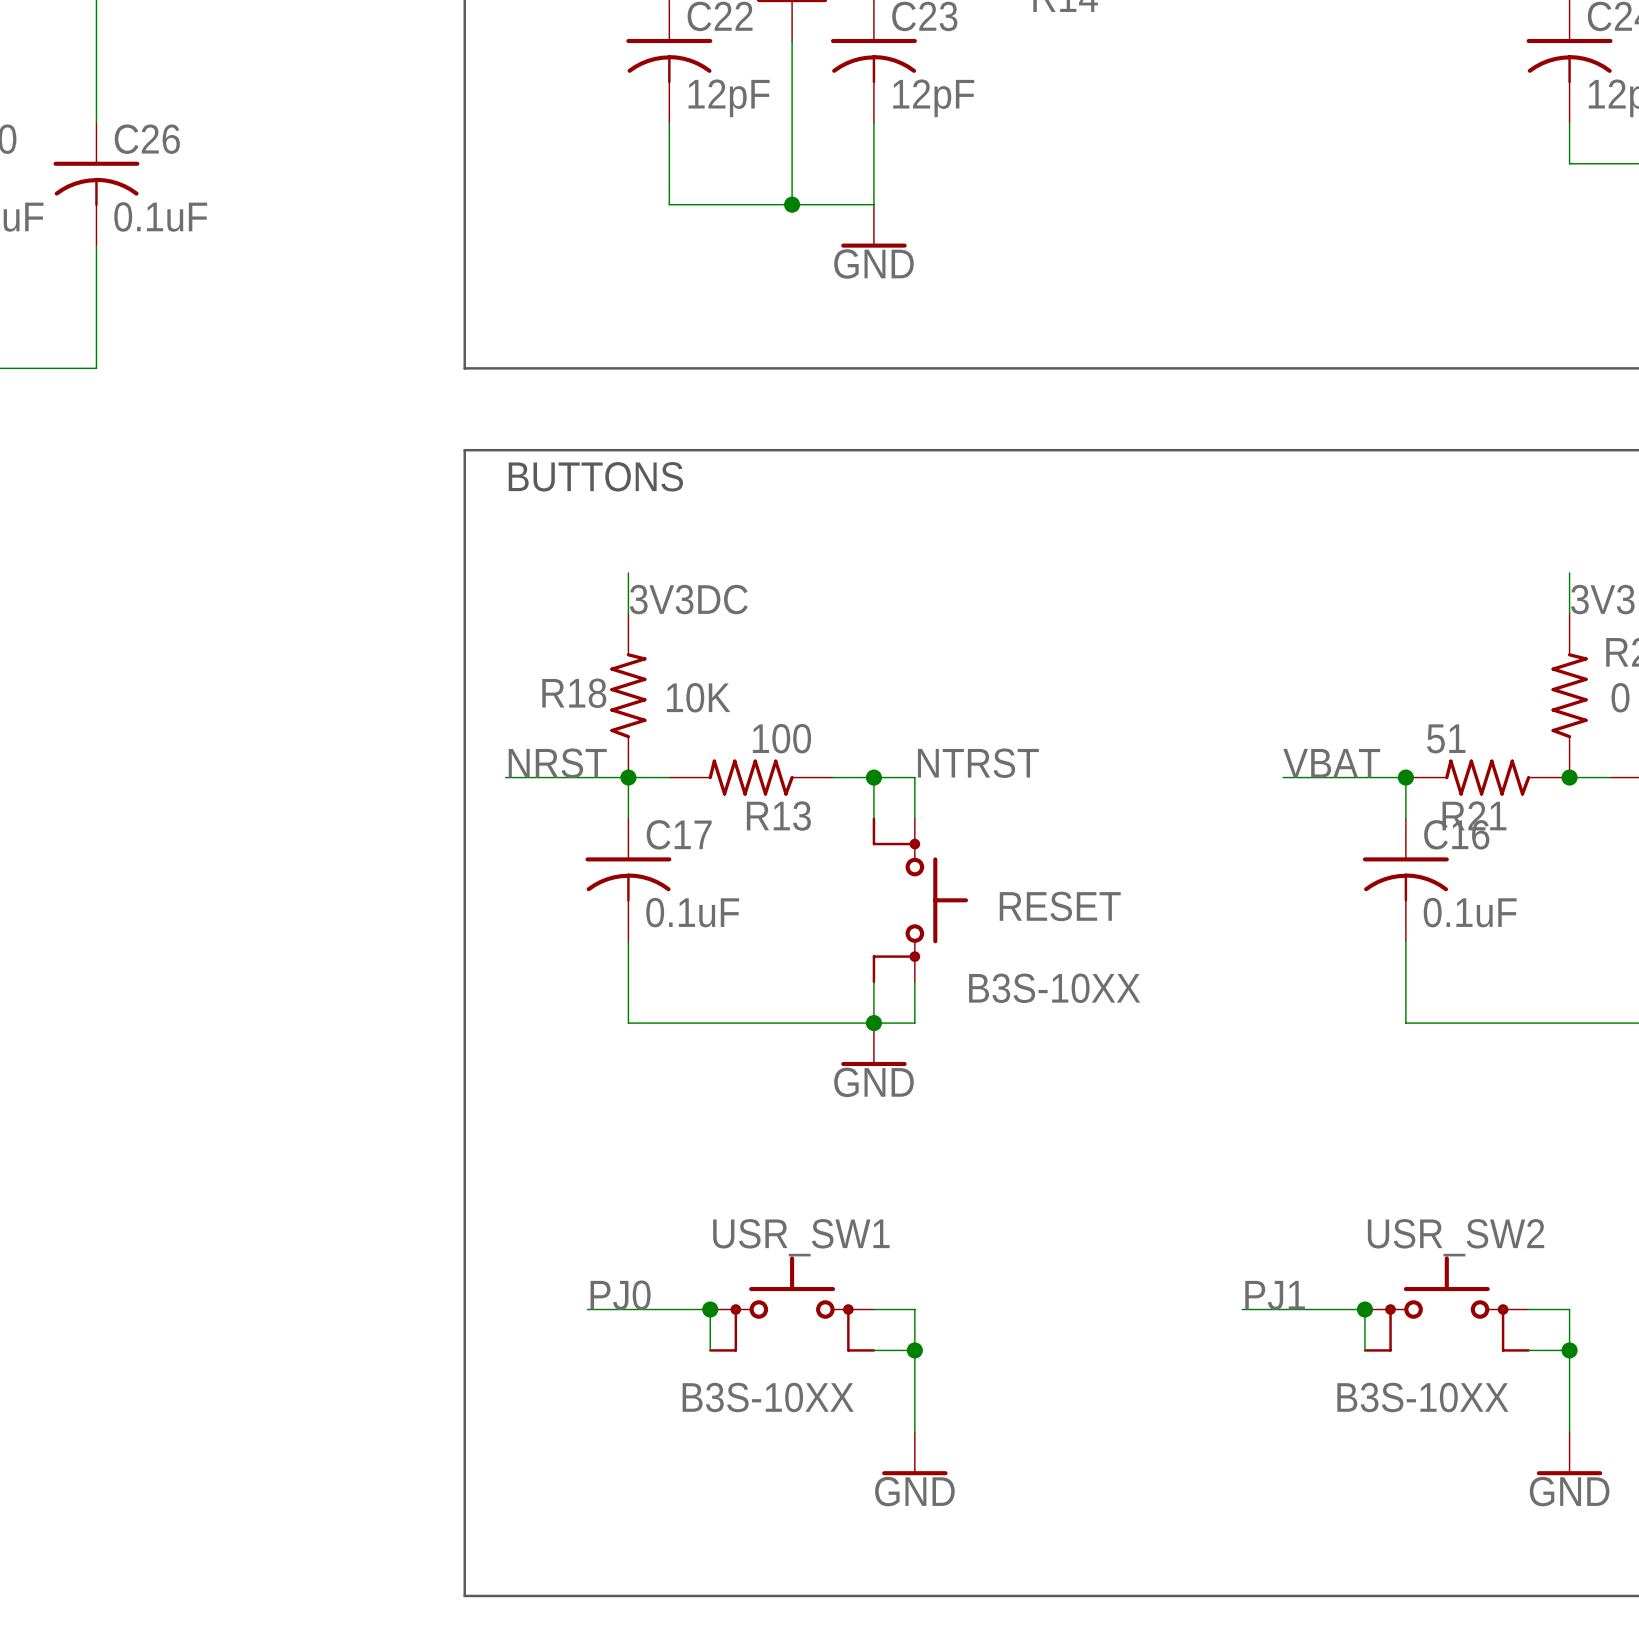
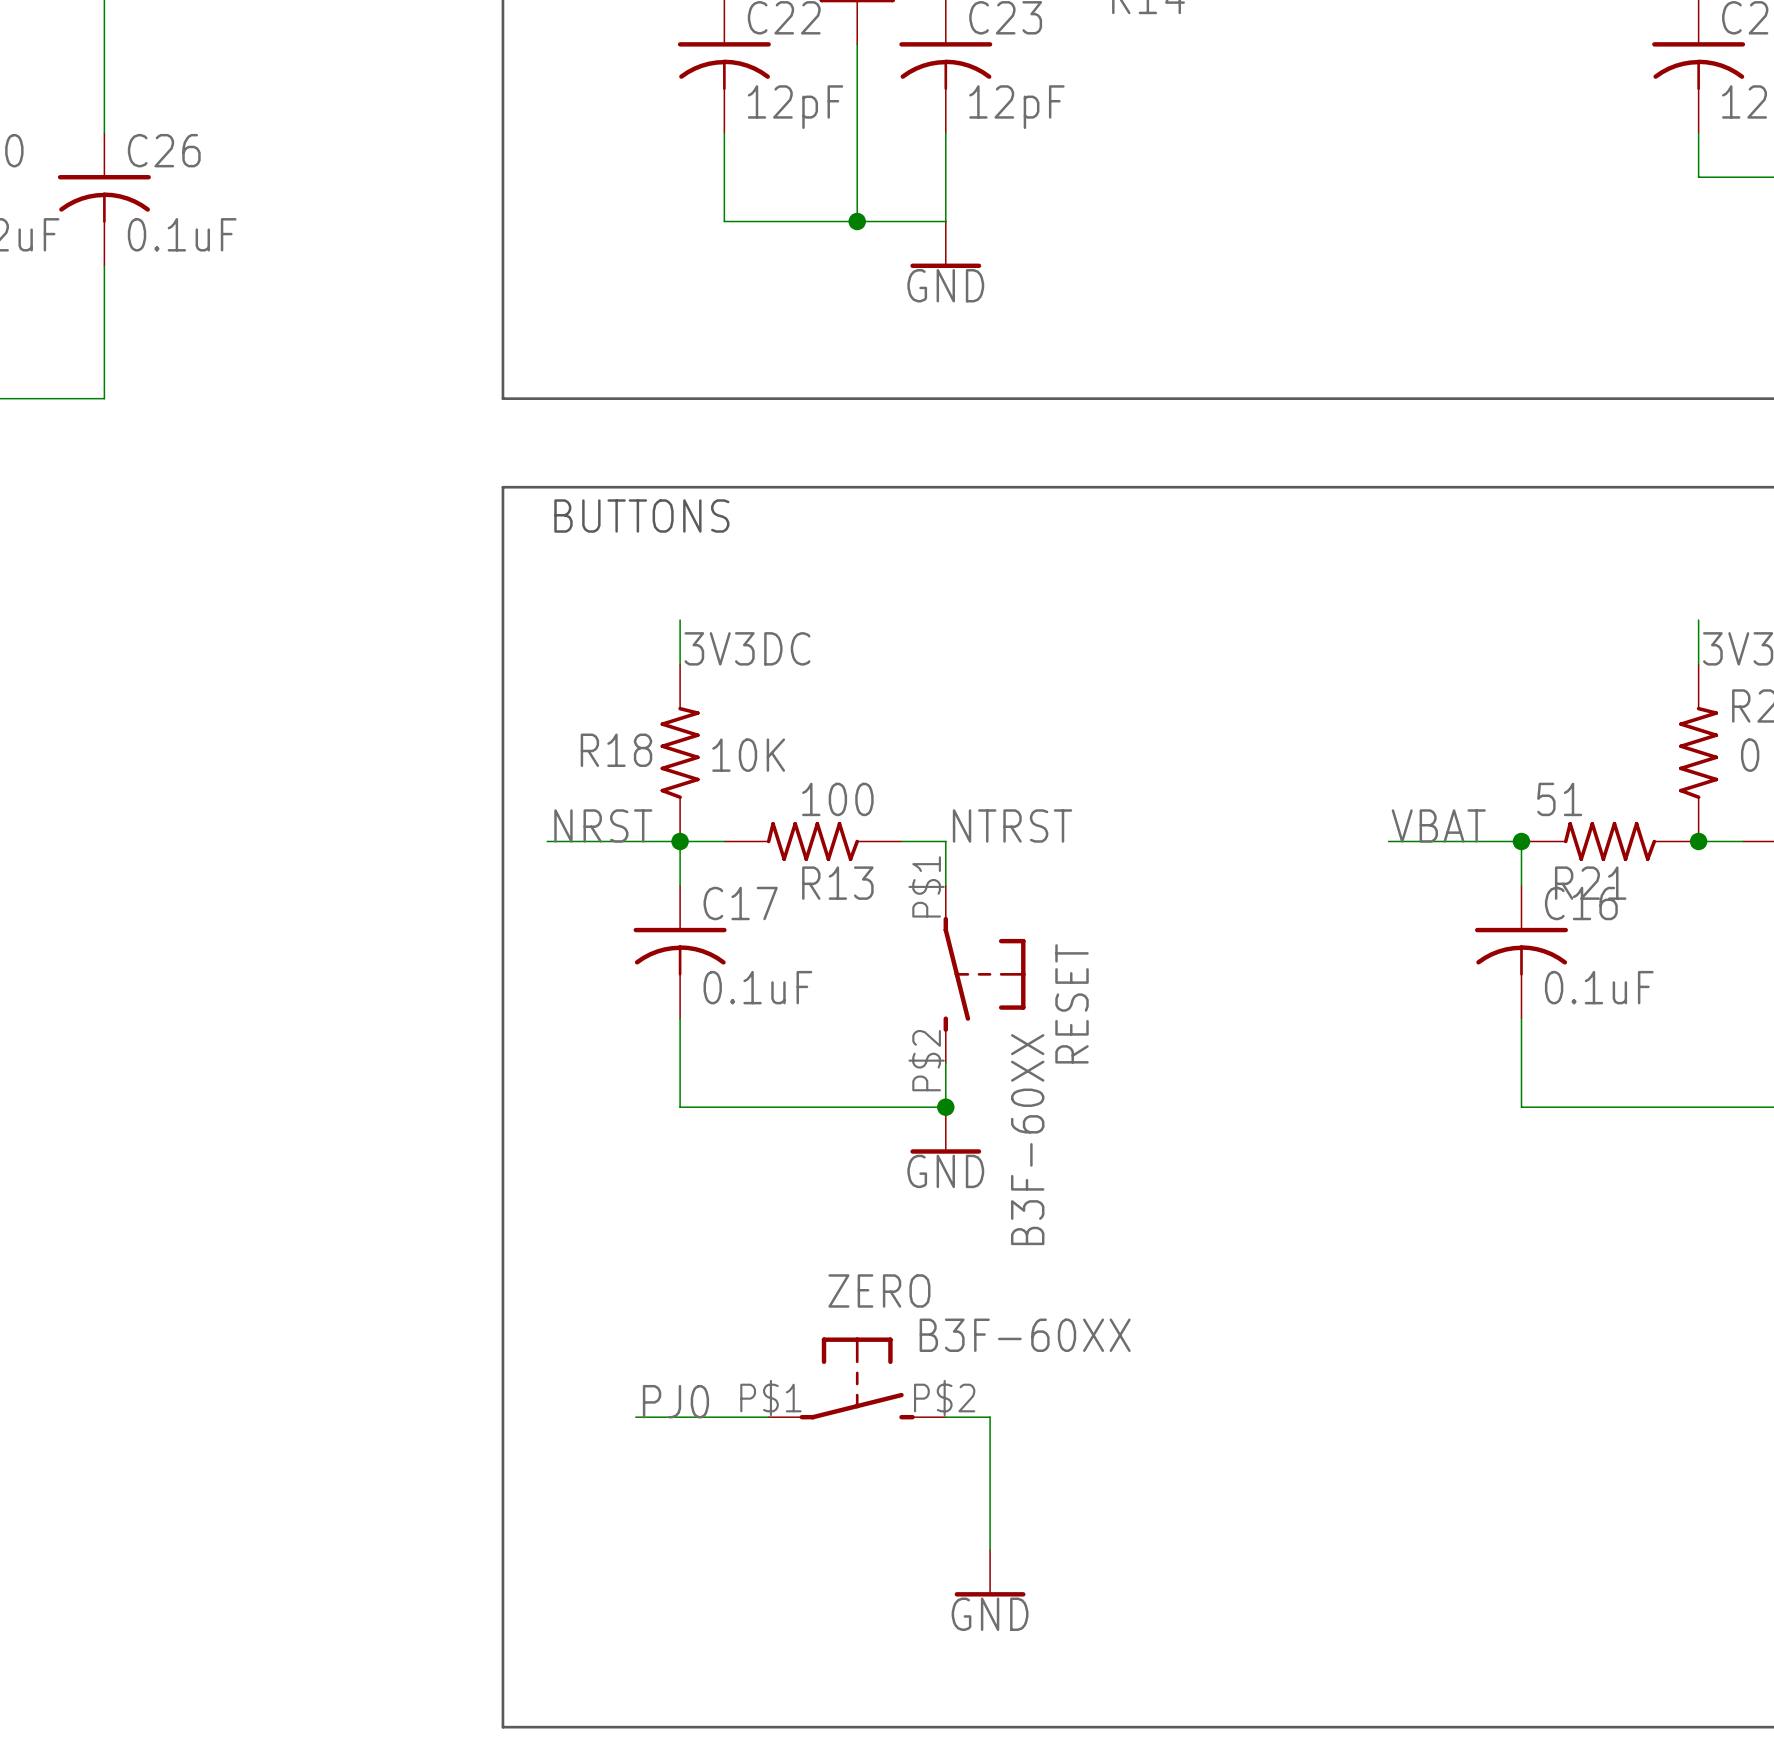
label position: NTRST (978, 763) -> NTRST (1012, 825)
wire: (873, 777) (914, 777) (914, 818) -> none
junction: (873, 777) -> none
RESET symbol: [872, 817, 969, 984] -> [943, 885, 1026, 1063]
RESET name position: RESET (1060, 906) -> RESET (1072, 1003)
wire: (914, 982) (914, 1023) (873, 1023) -> none
RESET value: B3S-10XX (1054, 988) -> B3F-60XX (1027, 1139)
ZERO: none -> B3F-60XX (857, 1378)
label: PJ1 (1275, 1295) -> none
USR_SW1: B3S-10XX (792, 1303) -> none
USR_SW2: B3S-10XX (1446, 1303) -> none
wire: (710, 1309) (710, 1350) -> none
junction: (710, 1309) -> none
wire: (1242, 1309) (1364, 1309) (1364, 1350) -> none
junction: (1364, 1309) -> none
wire: (1528, 1309) (1569, 1309) (1569, 1432) -> none
wire: (873, 1350) (914, 1350) -> none
junction: (914, 1350) -> none
wire: (1528, 1350) (1569, 1350) -> none
junction: (1569, 1350) -> none
power symbol: GND (1569, 1453) -> none

